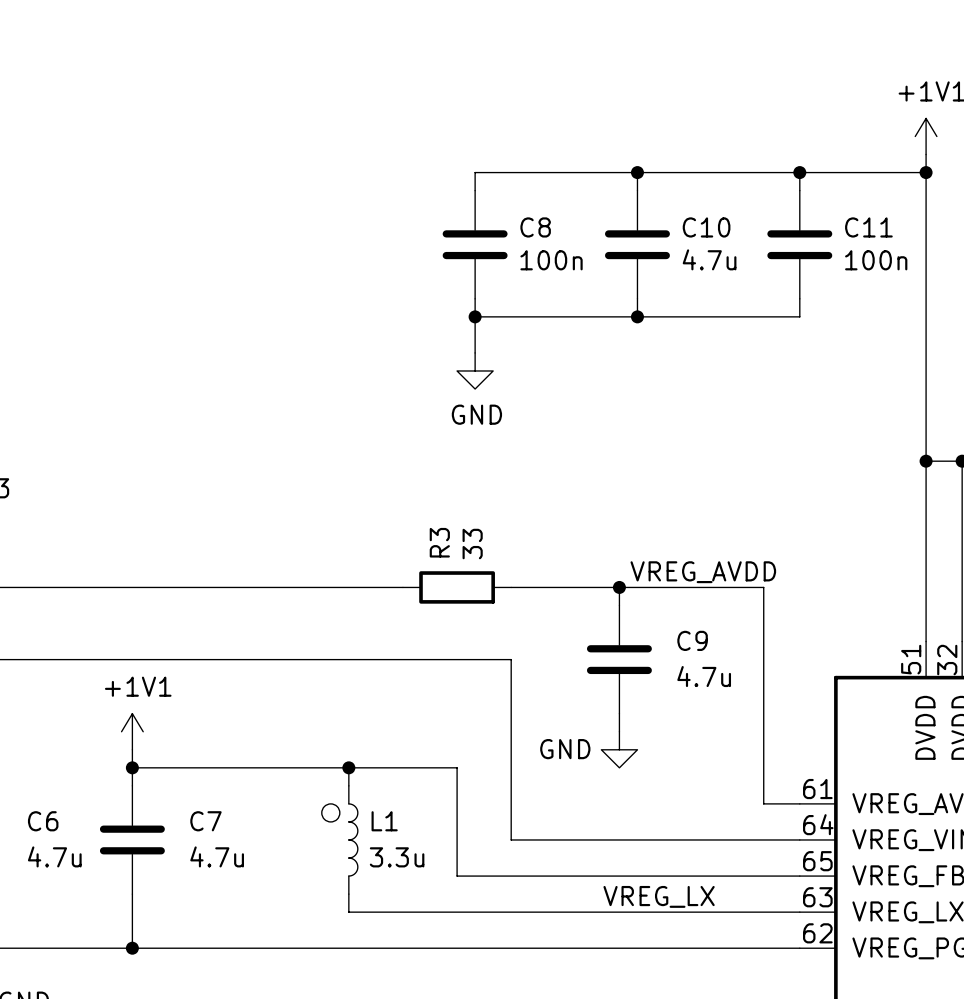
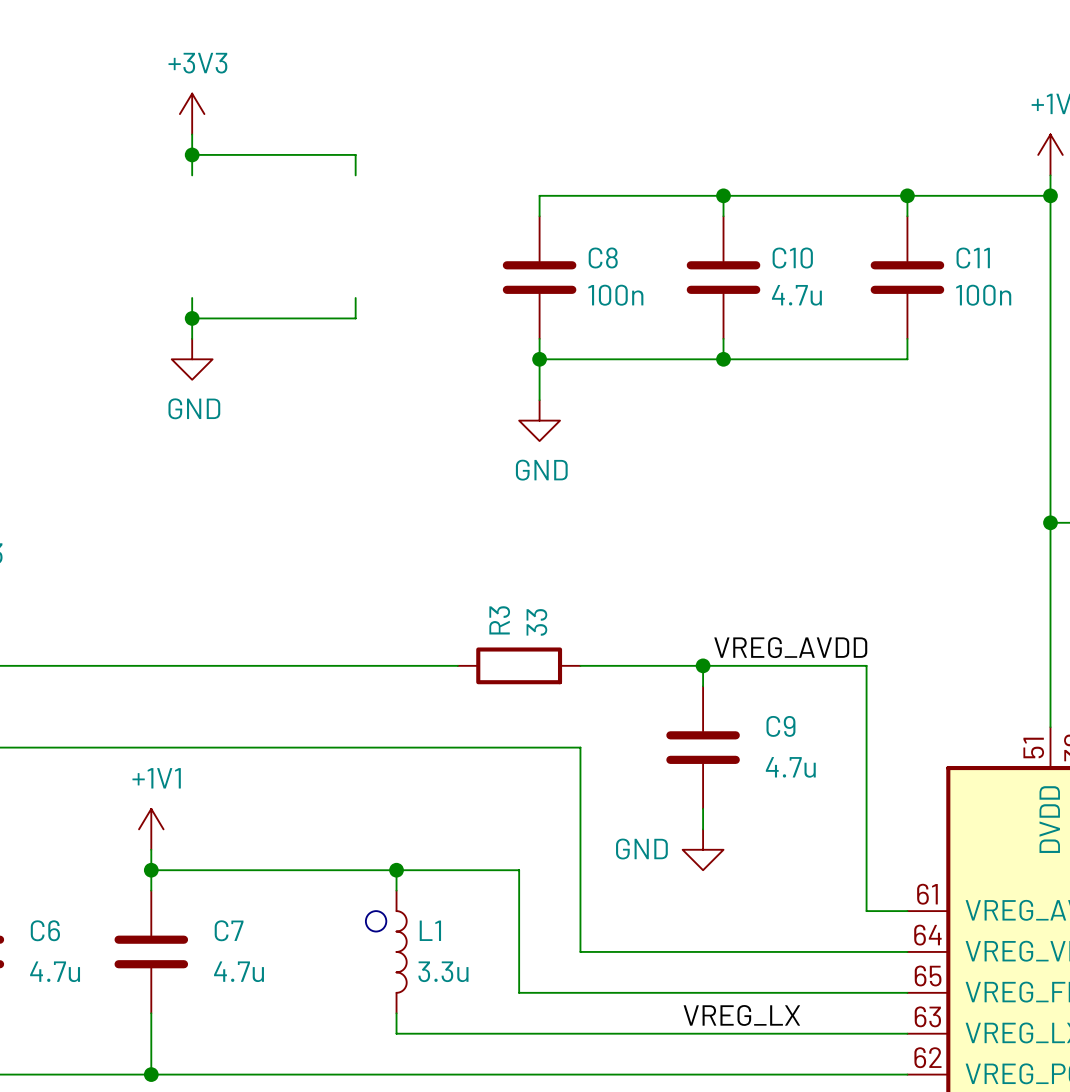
power symbol: none -> +3V3 (192, 114)
wire: none -> (192, 134) (192, 175)
wire: none -> (192, 154) (355, 154) (355, 175)
junction: none -> (192, 154)
wire: none -> (192, 298) (192, 338)
wire: none -> (355, 298) (355, 318) (192, 318)
junction: none -> (192, 318)
power symbol: none -> GND (192, 359)

